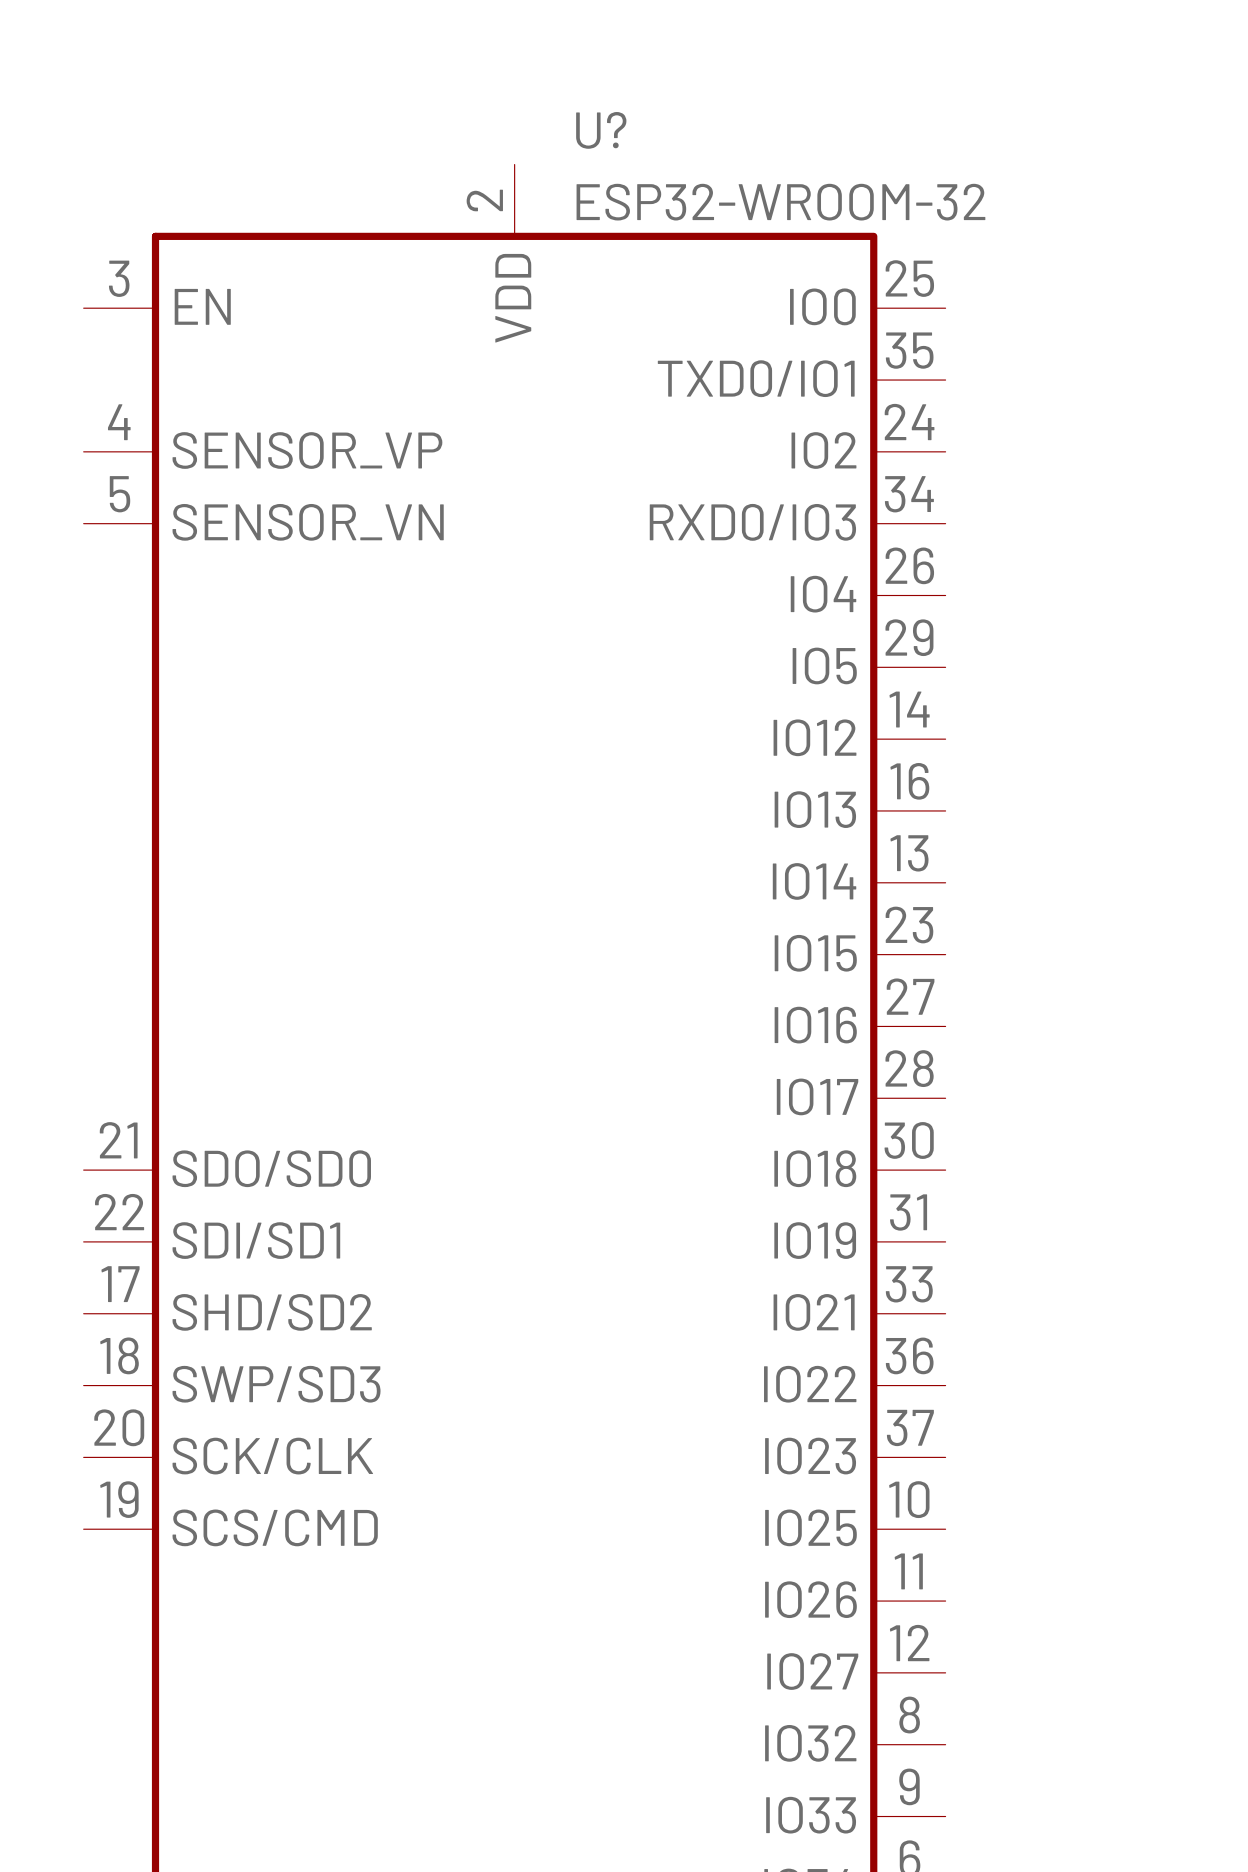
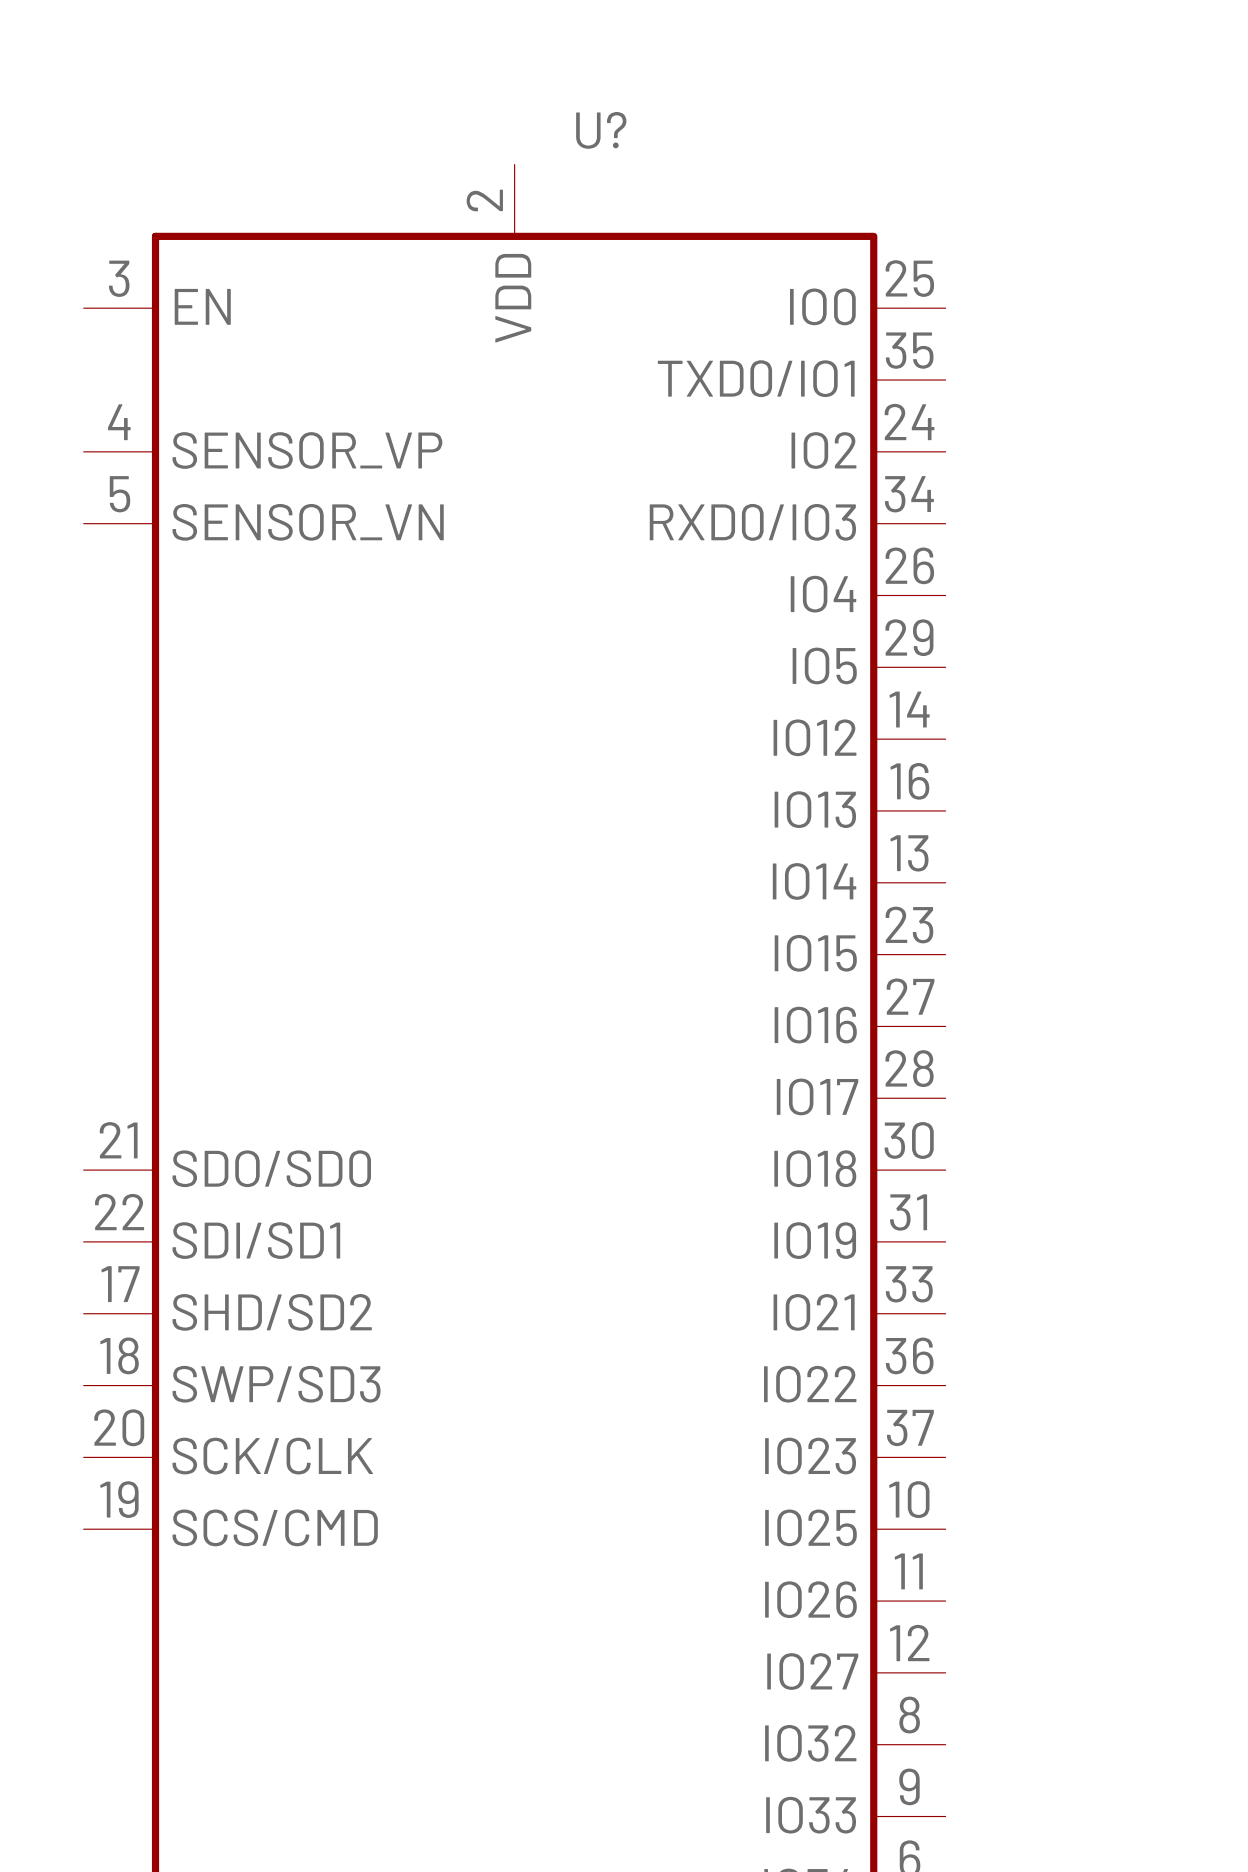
U? value: ESP32-WROOM-32 (780, 202) -> none

